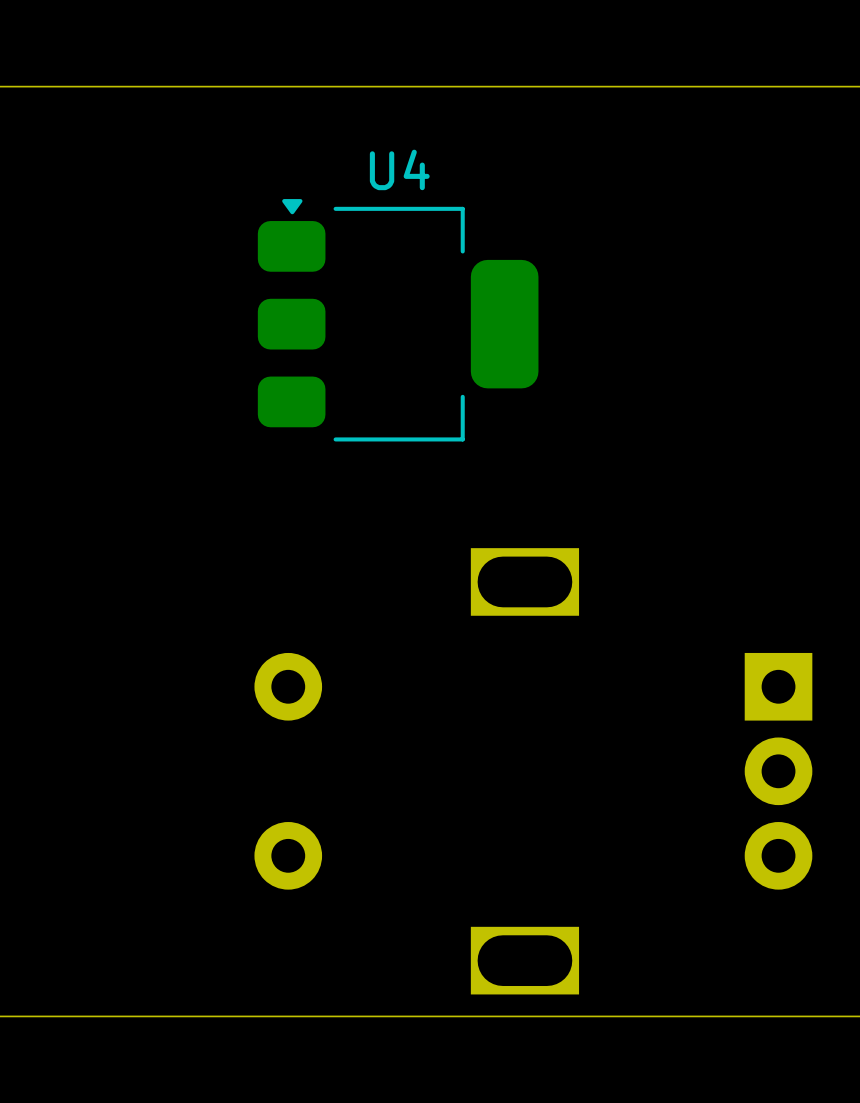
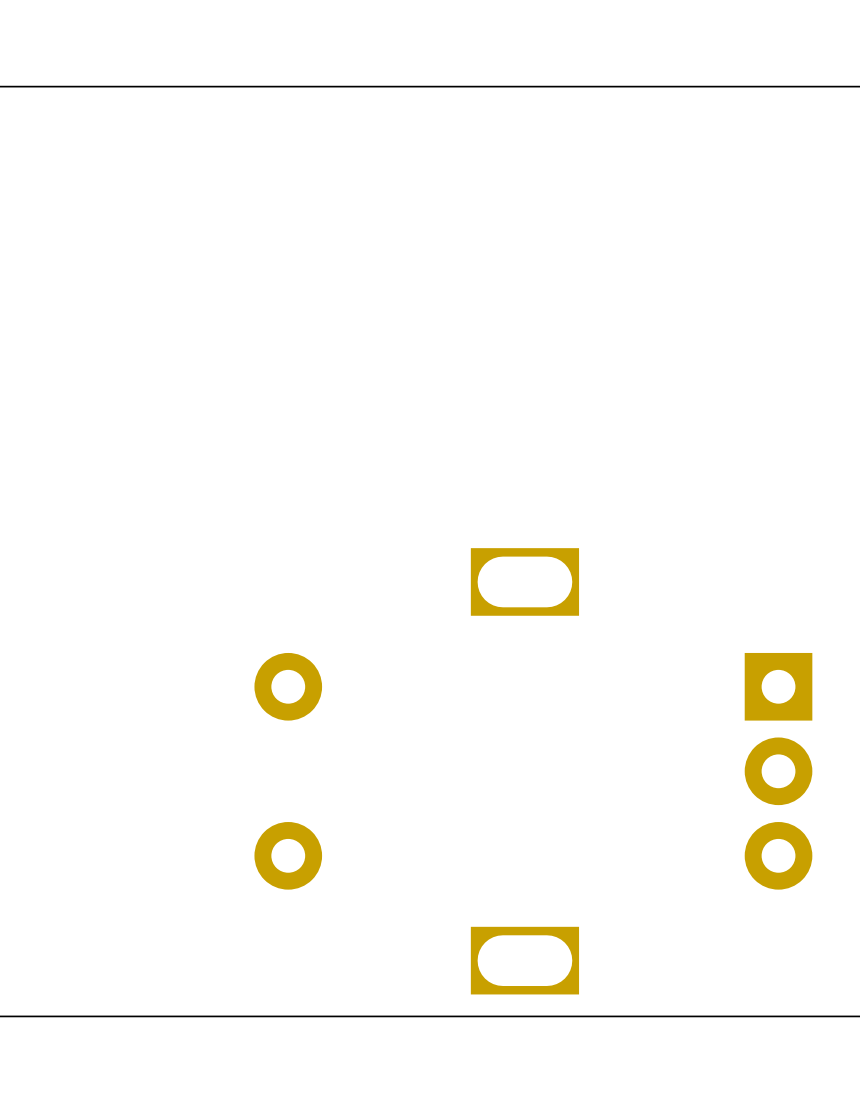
U4: (398, 320) -> none

